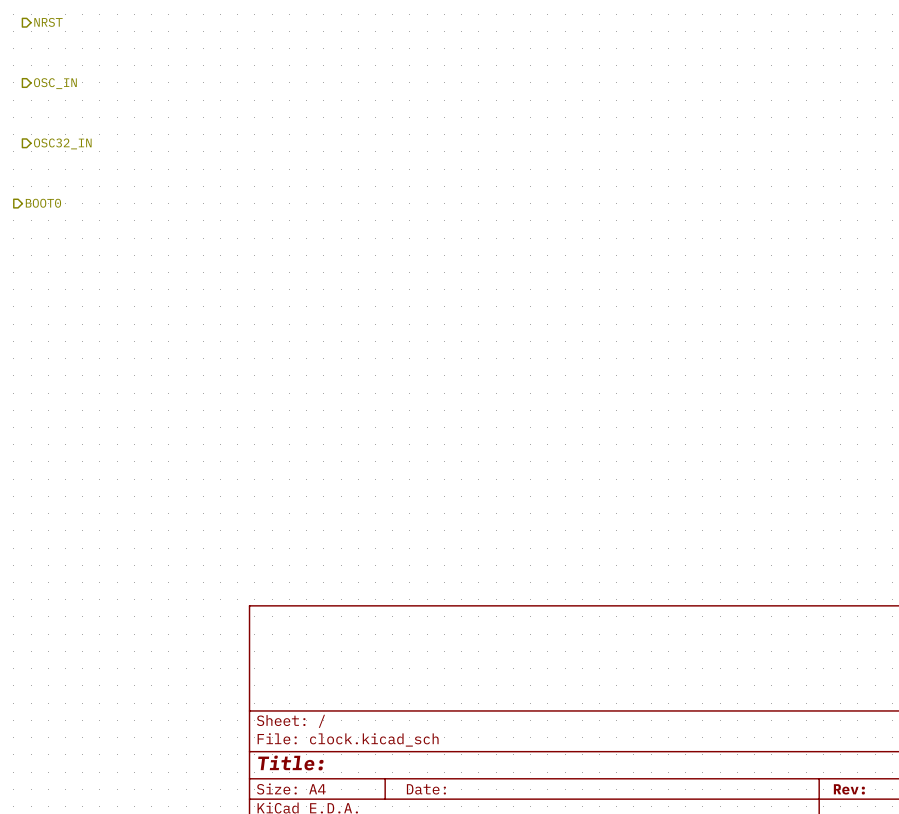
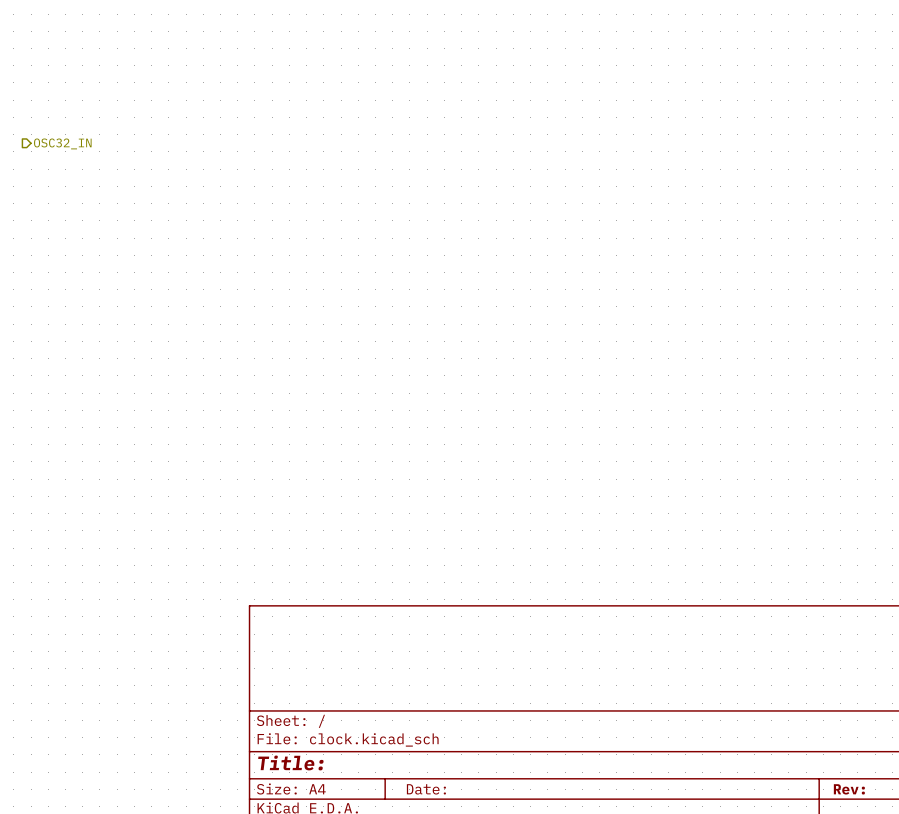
hierarchical label: NRST (48, 22) -> none
hierarchical label: OSC_IN (55, 83) -> none
hierarchical label: BOOT0 (43, 203) -> none

